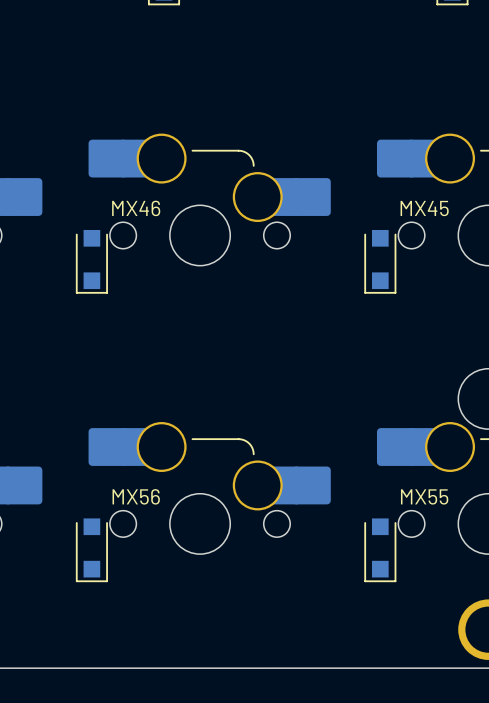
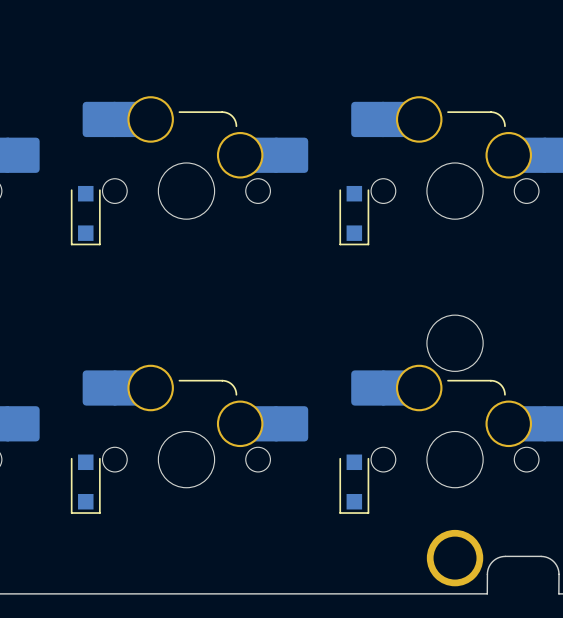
MX46 name: MX46 (136, 208) -> none
MX45 name: MX45 (424, 208) -> none
MX56 name: MX56 (136, 496) -> none
MX55 name: MX55 (424, 496) -> none

